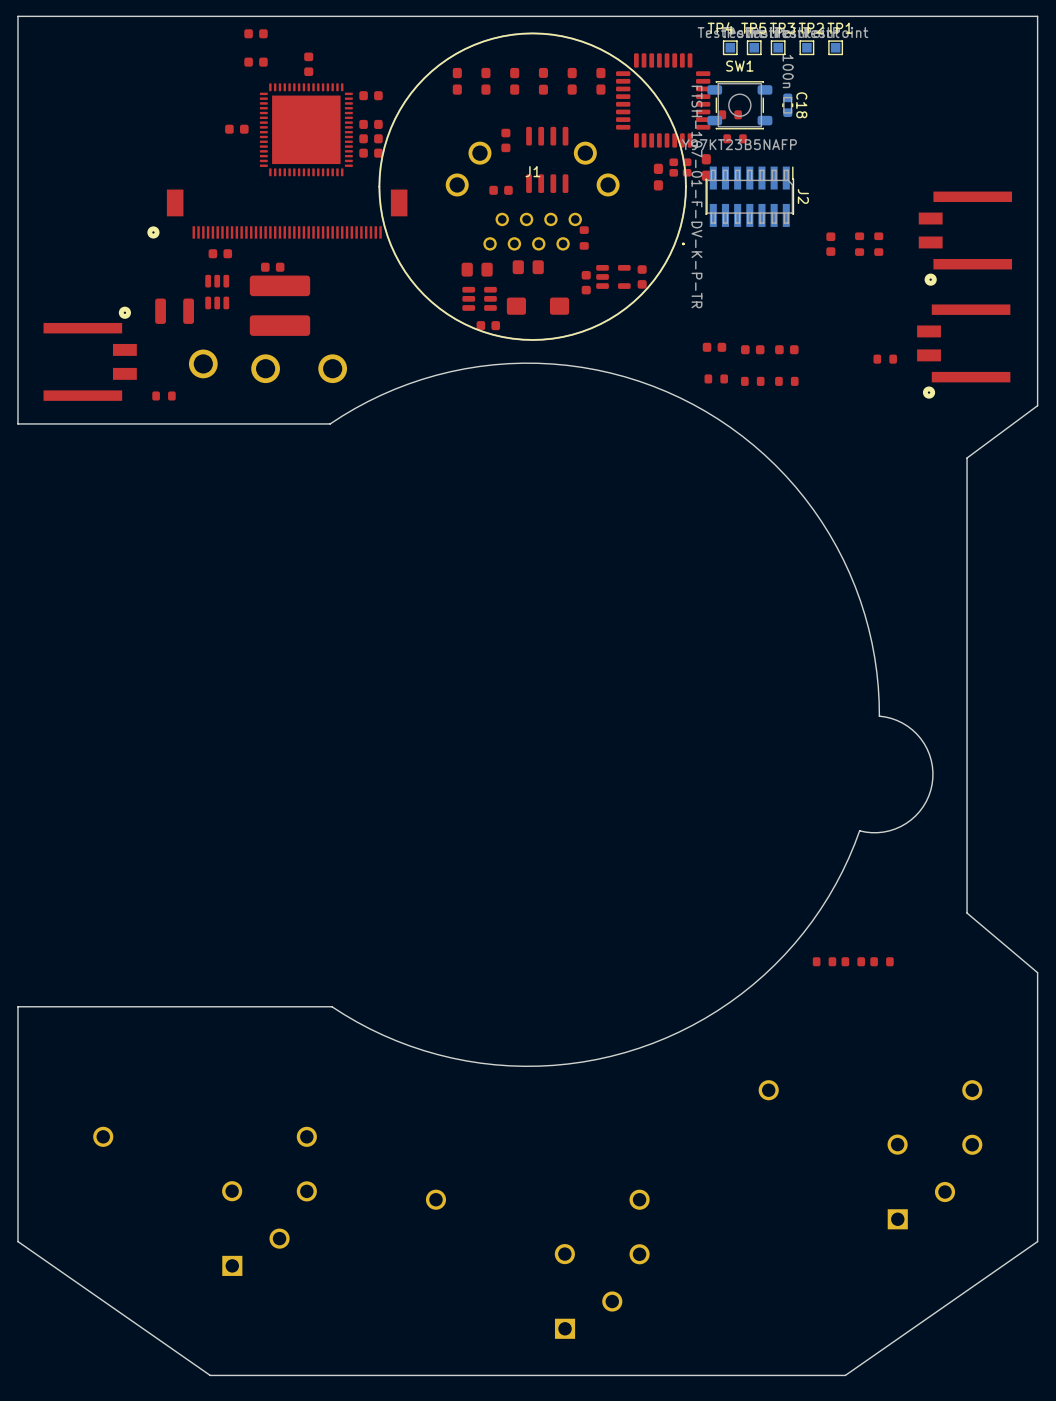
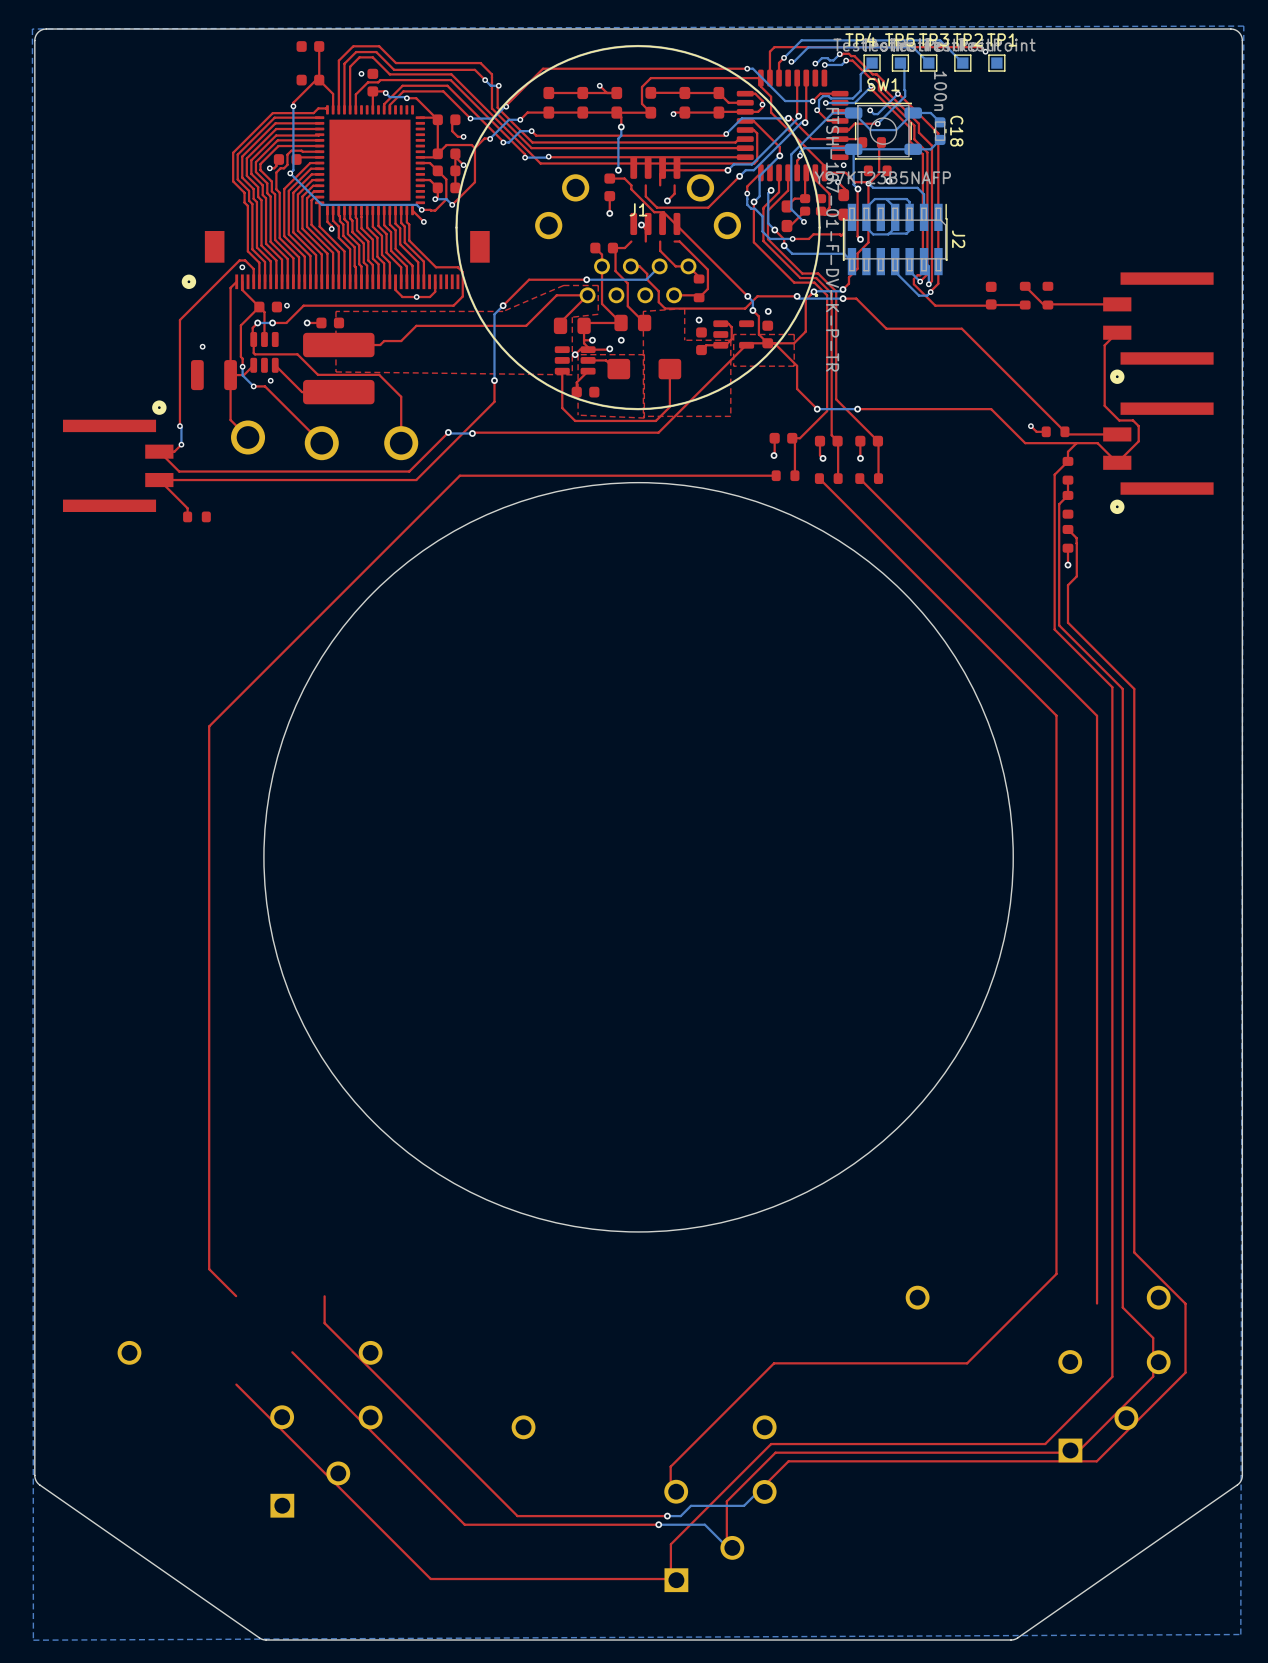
bottom zone outline: none -> (1243, 26) (32, 29) (33, 1640) (1240, 1634) (1243, 26)
top track: none -> (319, 46) (319, 80) (333, 93) (333, 109)
top track: none -> (353, 46) (379, 46) (395, 63) (480, 63) (491, 74) (491, 108) (531, 148) (745, 148)
top track: none -> (353, 46) (338, 60) (338, 109)
top track: none -> (985, 51) (980, 47) (774, 47) (769, 51) (769, 78)
via: none -> (985, 51)
top track: none -> (839, 54) (848, 53) (854, 56) (872, 74) (876, 74) (883, 81) (883, 88) (918, 123) (918, 132) (931, 145) (931, 281) (928, 284)
bottom track: none -> (839, 54) (833, 60) (821, 58) (815, 63)
via: none -> (839, 54)
top track: none -> (784, 57) (779, 62) (779, 78)
bottom track: none -> (784, 57) (801, 40) (940, 40) (962, 63)
via: none -> (784, 57)
top track: none -> (846, 60) (852, 60) (870, 78) (874, 78) (878, 82) (878, 90) (914, 125) (914, 139) (927, 152) (927, 274) (920, 281)
bottom track: none -> (846, 60) (841, 64) (824, 64)
via: none -> (846, 60)
bottom track: none -> (791, 61) (794, 61) (808, 47) (913, 47) (928, 63)
via: none -> (791, 61)
bottom track: none -> (872, 63) (860, 74) (860, 90) (852, 98) (830, 98) (828, 96) (823, 96) (819, 100) (819, 108) (817, 110)
via: none -> (815, 63)
via: none -> (824, 64)
bottom track: none -> (904, 67) (905, 96) (877, 123)
top track: none -> (747, 68) (543, 68) (506, 106)
bottom track: none -> (747, 68) (752, 68) (785, 101) (812, 101)
via: none -> (747, 68)
via: none -> (361, 73)
top track: none -> (797, 78) (798, 116)
top track: none -> (806, 78) (805, 122)
top track: none -> (316, 80) (293, 102) (293, 106)
top track: none -> (485, 80) (474, 69) (394, 69) (376, 52) (356, 52) (344, 63) (344, 109)
bottom track: none -> (485, 80) (490, 85) (498, 85)
via: none -> (485, 80)
top track: none -> (498, 85) (497, 107) (532, 142) (735, 142) (738, 139) (745, 139)
via: none -> (498, 85)
top track: none -> (599, 85) (606, 92)
via: none -> (599, 85)
top track: none -> (871, 85) (872, 89) (909, 127) (909, 141) (922, 154) (922, 272) (913, 278) (913, 284) (935, 305) (991, 304)
bottom track: none -> (871, 85) (854, 102) (825, 102)
via: none -> (871, 85)
top track: none -> (683, 92) (650, 92)
top track: none -> (385, 93) (372, 91) (372, 109)
bottom track: none -> (385, 93) (389, 97) (406, 98)
via: none -> (385, 93)
top track: none -> (616, 92) (548, 92)
top track: none -> (684, 92) (718, 92) (728, 102) (745, 102)
top track: none -> (745, 93) (755, 93) (762, 100) (762, 107) (758, 111) (719, 111)
top track: none -> (840, 93) (820, 93) (812, 101)
top track: none -> (897, 93) (938, 133) (938, 283) (930, 292)
bottom track: none -> (897, 93) (877, 114) (873, 114) (870, 110)
via: none -> (897, 93)
top track: none -> (406, 98) (416, 98) (437, 119) (437, 153) (446, 145) (471, 145) (474, 148)
via: none -> (406, 98)
via: none -> (812, 101)
via: none -> (825, 102)
via: none -> (762, 104)
bottom track: none -> (293, 106) (293, 170) (290, 173) (321, 204) (416, 204) (421, 209)
via: none -> (293, 106)
bottom track: none -> (506, 106) (493, 118) (470, 118)
via: none -> (506, 106)
top track: none -> (327, 109) (318, 108) (313, 113) (272, 113) (233, 152) (233, 181) (244, 192) (244, 202) (247, 205) (247, 251) (259, 262) (259, 281)
top track: none -> (350, 109) (350, 66) (359, 57) (372, 57) (389, 74) (451, 74) (540, 163) (754, 163) (757, 160) (757, 133) (753, 130) (745, 130)
top track: none -> (355, 109) (355, 94) (368, 82) (378, 82) (380, 80) (450, 80) (525, 154) (525, 157)
top track: none -> (384, 109) (384, 104) (402, 85) (447, 85) (503, 142)
top track: none -> (389, 109) (389, 105) (403, 91) (443, 91) (470, 118)
top track: none -> (817, 110) (827, 120) (840, 120)
via: none -> (817, 110)
via: none -> (870, 110)
top track: none -> (616, 112) (650, 112) (642, 103) (642, 86) (650, 78) (760, 78) (760, 86) (771, 96) (771, 112) (824, 165) (824, 172) (845, 172) (855, 182) (868, 183)
top track: none -> (718, 112) (675, 112) (673, 114)
via: none -> (673, 114)
bottom track: none -> (798, 116) (751, 164) (733, 164) (727, 170)
via: none -> (798, 116)
top track: none -> (319, 117) (274, 117) (237, 154) (237, 179) (249, 190) (249, 200) (252, 204) (252, 249) (265, 262) (265, 281)
top track: none -> (435, 117) (420, 117)
via: none -> (470, 118)
top track: none -> (788, 118) (791, 118) (811, 139) (859, 139) (862, 142)
bottom track: none -> (788, 118) (741, 118) (726, 133)
via: none -> (788, 118)
top track: none -> (520, 119) (527, 112) (616, 112) (621, 117) (621, 126)
bottom track: none -> (520, 119) (508, 119) (490, 138)
via: none -> (520, 119)
top track: none -> (745, 120) (753, 120) (779, 147) (779, 155)
bottom track: none -> (940, 122) (930, 112) (913, 112) (896, 130) (870, 130) (853, 112) (832, 112) (791, 154) (791, 209) (803, 221)
top track: none -> (319, 123) (275, 123) (242, 156) (242, 177) (253, 189) (253, 198) (256, 202) (256, 247) (270, 261) (270, 281)
top track: none -> (452, 122) (452, 131) (457, 136) (463, 136)
bottom track: none -> (805, 122) (801, 122) (753, 170) (745, 170) (739, 176)
via: none -> (805, 122)
top track: none -> (877, 123) (854, 123) (848, 130) (840, 130)
via: none -> (877, 123)
bottom track: none -> (621, 126) (621, 135) (618, 138) (618, 170)
via: none -> (621, 126)
top track: none -> (319, 129) (276, 129) (246, 158) (246, 175) (258, 187) (258, 196) (261, 200) (261, 245) (276, 260) (276, 281)
top track: none -> (531, 131) (536, 135) (724, 135) (726, 133)
bottom track: none -> (531, 131) (520, 131) (508, 142) (503, 142)
via: none -> (531, 131)
via: none -> (726, 133)
top track: none -> (319, 134) (276, 135) (251, 160) (251, 173) (262, 185) (262, 195) (266, 198) (266, 243) (282, 259) (282, 281)
via: none -> (463, 136)
top track: none -> (490, 138) (484, 138) (474, 148)
via: none -> (490, 138)
bottom track: none -> (940, 139) (930, 149) (853, 149) (853, 184) (858, 189)
top track: none -> (319, 140) (277, 140) (255, 162) (255, 172) (267, 183) (267, 193) (270, 196) (270, 241) (287, 258) (287, 281)
via: none -> (503, 142)
top track: none -> (881, 142) (879, 144) (879, 173) (868, 183)
top track: none -> (319, 146) (278, 146) (260, 164) (260, 170) (271, 181) (271, 191) (275, 194) (275, 239) (293, 258) (293, 281)
top track: none -> (474, 148) (474, 182) (452, 204)
bottom track: none -> (852, 148) (803, 148) (800, 152) (800, 155)
top track: none -> (319, 151) (291, 150) (287, 154) (287, 164) (276, 172) (276, 189) (279, 192) (279, 238) (299, 257) (299, 281)
top track: none -> (455, 153) (455, 187)
top track: none -> (548, 156) (745, 157)
bottom track: none -> (548, 156) (525, 157)
via: none -> (548, 156)
bottom track: none -> (779, 155) (759, 175) (759, 196) (754, 201)
via: none -> (779, 155)
top track: none -> (800, 155) (797, 160) (797, 172)
via: none -> (800, 155)
top track: none -> (319, 157) (298, 157)
top track: none -> (434, 157) (420, 157)
top track: none -> (455, 156) (463, 165)
via: none -> (525, 157)
top track: none -> (276, 162) (274, 168) (269, 168)
top track: none -> (319, 163) (310, 163) (284, 189) (284, 236) (304, 256) (304, 281)
top track: none -> (420, 163) (429, 163) (446, 179) (446, 199) (435, 210) (421, 209)
via: none -> (463, 165)
via: none -> (843, 165)
via: none -> (269, 168)
top track: none -> (319, 168) (310, 168) (288, 190) (288, 234) (310, 255) (310, 281)
via: none -> (618, 170)
top track: none -> (727, 170) (664, 170) (660, 174) (660, 185)
via: none -> (727, 170)
via: none -> (290, 173)
part position: (505, 140) -> (609, 187)
top track: none -> (760, 172) (747, 186) (747, 193)
top track: none -> (779, 172) (779, 192) (763, 207)
top track: none -> (788, 172) (788, 190) (767, 210) (767, 239) (802, 273) (818, 273) (836, 291) (836, 399) (878, 441) (878, 478)
top track: none -> (319, 174) (311, 174) (293, 192) (293, 232) (316, 255) (316, 281)
top track: none -> (805, 173) (805, 198) (794, 198) (786, 206)
top track: none -> (739, 176) (708, 207) (657, 207) (645, 196) (645, 185)
via: none -> (739, 176)
top track: none -> (609, 178) (624, 178) (631, 185) (631, 189) (654, 212) (663, 212) (747, 296)
top track: none -> (319, 180) (312, 180) (297, 194) (297, 230) (321, 254) (321, 281)
top track: none -> (420, 180) (429, 180) (437, 187) (437, 196) (435, 199)
top track: none -> (815, 179) (829, 193) (829, 207) (826, 211) (821, 211) (824, 214) (843, 214)
via: none -> (889, 181)
top track: none -> (838, 182) (845, 189) (845, 193)
via: none -> (838, 182)
top track: none -> (868, 183) (868, 242) (857, 253) (857, 268) (848, 277) (848, 283) (843, 289)
bottom track: none -> (868, 183) (873, 187) (917, 187) (924, 194) (924, 217)
via: none -> (868, 183)
top track: none -> (319, 185) (313, 185) (302, 196) (302, 228) (327, 253) (327, 281)
top track: none -> (674, 185) (674, 193) (667, 200)
top track: none -> (858, 189) (857, 236) (860, 239)
via: none -> (858, 189)
bottom track: none -> (771, 190) (768, 193) (768, 223) (774, 229)
via: none -> (771, 190)
top track: none -> (319, 191) (314, 191) (307, 198) (307, 226) (333, 252) (333, 281)
bottom track: none -> (747, 193) (747, 204) (762, 216) (762, 231) (769, 238) (792, 238)
via: none -> (747, 193)
top track: none -> (319, 197) (314, 197) (311, 200) (311, 224) (338, 252) (338, 281)
top track: none -> (609, 196) (609, 213)
bottom track: none -> (435, 199) (446, 199) (452, 204)
via: none -> (435, 199)
bottom track: none -> (886, 199) (895, 207) (895, 227) (888, 234) (873, 234) (866, 227) (866, 207) (874, 199) (906, 199) (909, 202) (909, 230) (906, 233) (889, 233)
via: none -> (667, 200)
top track: none -> (319, 202) (319, 226) (344, 251) (344, 281)
top track: none -> (754, 201) (753, 242) (794, 282) (814, 282) (827, 295) (827, 411) (799, 438) (792, 438) (794, 440) (794, 475)
via: none -> (754, 201)
via: none -> (452, 204)
top track: none -> (763, 208) (763, 241) (800, 278) (816, 278) (831, 293) (831, 435) (838, 441) (838, 478)
via: none -> (421, 209)
top track: none -> (327, 210) (327, 221) (331, 228)
top track: none -> (333, 210) (333, 220) (338, 226) (338, 237) (350, 249) (350, 281)
top track: none -> (338, 210) (339, 221) (343, 224) (343, 235) (354, 247) (355, 281)
top track: none -> (344, 210) (344, 219) (347, 222) (347, 234) (359, 245) (361, 281)
top track: none -> (350, 210) (352, 232) (363, 243) (363, 262) (367, 265) (367, 281)
top track: none -> (355, 210) (356, 230) (368, 241) (368, 260) (372, 265) (372, 281)
top track: none -> (361, 210) (361, 228) (372, 239) (372, 258) (378, 264) (378, 281)
top track: none -> (367, 210) (367, 227) (377, 237) (377, 256) (384, 263) (384, 281)
top track: none -> (372, 210) (372, 226) (381, 235) (381, 254) (389, 262) (389, 281)
top track: none -> (378, 210) (378, 226) (386, 234) (386, 252) (401, 267) (401, 281)
top track: none -> (384, 210) (384, 225) (391, 232) (391, 250) (406, 266) (406, 281)
top track: none -> (389, 210) (389, 224) (395, 230) (395, 248) (412, 265) (412, 281)
top track: none -> (395, 210) (395, 223) (400, 228) (400, 244) (418, 262) (418, 281)
top track: none -> (401, 210) (401, 222) (404, 226) (404, 242) (423, 261) (423, 281)
top track: none -> (406, 210) (409, 240) (436, 267) (457, 267) (462, 272) (462, 296) (453, 305) (303, 305) (286, 322) (272, 322)
top track: none -> (412, 210) (423, 221)
top track: none -> (805, 211) (790, 226)
via: none -> (609, 213)
via: none -> (423, 221)
via: none -> (803, 221)
top track: none -> (641, 224) (645, 229) (645, 241)
via: none -> (641, 224)
via: none -> (331, 228)
top track: none -> (774, 229) (784, 239) (784, 245)
via: none -> (774, 229)
part position: (501, 190) -> (604, 248)
top track: none -> (843, 233) (841, 235) (813, 234) (808, 238) (792, 238)
via: none -> (792, 238)
via: none -> (860, 239)
top track: none -> (631, 241) (624, 248) (612, 248) (615, 250) (615, 271) (627, 283) (627, 306) (644, 322)
top track: none -> (660, 241) (660, 250) (675, 266) (688, 266) (699, 279)
top track: none -> (674, 241) (679, 241) (707, 269) (707, 288) (699, 297) (696, 295) (674, 295)
bottom track: none -> (784, 245) (792, 253) (844, 253) (851, 261)
via: none -> (784, 245)
top track: none -> (595, 248) (602, 254) (602, 303) (621, 322) (586, 322) (584, 325) (584, 343) (588, 349)
bottom track: none -> (924, 261) (928, 266) (928, 284)
top track: none -> (630, 266) (639, 266) (647, 273) (647, 279) (658, 291) (658, 302) (665, 308) (745, 308) (757, 296) (797, 296)
bottom track: none -> (659, 266) (646, 279) (586, 279)
via: none -> (242, 267)
bottom track: none -> (909, 271) (920, 281)
bottom track: none -> (895, 271) (919, 295) (927, 295) (930, 292)
top track: none -> (586, 279) (529, 279) (503, 305)
via: none -> (586, 279)
top track: none -> (236, 281) (230, 287) (230, 420) (236, 426) (248, 426)
top track: none -> (242, 281) (242, 289) (264, 312) (264, 339)
top track: none -> (253, 281) (253, 269) (245, 260) (239, 260) (179, 320) (179, 426)
top track: none -> (435, 281) (435, 291) (429, 297) (402, 297) (395, 289) (395, 281)
via: none -> (920, 281)
via: none -> (928, 284)
top zone outline: none -> (598, 285) (598, 314) (572, 317) (572, 374) (335, 371) (335, 311) (503, 311) (563, 285) (598, 285)
top track: none -> (1025, 286) (1043, 305)
bottom track: none -> (843, 289) (841, 291) (813, 291)
via: none -> (843, 289)
part position: (965, 238) -> (1158, 328)
top track: none -> (813, 291) (805, 299) (805, 331) (794, 343) (747, 343) (658, 432) (472, 433)
via: none -> (813, 291)
via: none -> (930, 292)
bottom track: none -> (747, 296) (752, 301) (752, 310)
via: none -> (747, 296)
bottom track: none -> (797, 296) (799, 298) (843, 298)
via: none -> (797, 296)
via: none -> (416, 297)
top track: none -> (843, 298) (856, 298) (886, 328) (961, 328) (1064, 431)
via: none -> (843, 298)
top track: none -> (1117, 304) (1048, 304)
via: none -> (286, 305)
bottom track: none -> (503, 305) (494, 314) (494, 380)
via: none -> (503, 305)
top track: none -> (1025, 305) (991, 305)
top track: none -> (259, 307) (240, 325) (242, 366)
top zone outline: none -> (684, 308) (643, 311) (643, 416) (730, 416) (730, 340) (684, 340) (684, 308)
top track: none -> (752, 310) (758, 316) (758, 334) (767, 343)
via: none -> (752, 310)
via: none -> (768, 311)
via: none -> (699, 320)
top track: none -> (257, 322) (252, 327) (254, 354) (297, 354) (317, 374) (379, 374) (401, 396) (401, 443)
via: none -> (257, 322)
bottom track: none -> (272, 322) (257, 322)
via: none -> (272, 322)
via: none -> (307, 322)
top track: none -> (321, 322) (307, 322)
top track: none -> (720, 323) (728, 323) (731, 327) (731, 339) (725, 345) (706, 345) (701, 350)
top track: none -> (560, 325) (560, 322) (587, 295) (556, 295) (526, 325) (416, 325) (401, 341) (384, 341) (380, 345) (338, 345)
top track: none -> (1117, 332) (1104, 345) (1104, 405) (1119, 420) (1133, 420) (1138, 426) (1138, 441) (1117, 462) (1097, 443) (1025, 443) (991, 409) (857, 409)
top zone outline: none -> (794, 334) (733, 334) (733, 366) (794, 366) (794, 334)
top track: none -> (592, 340) (584, 340)
via: none -> (592, 340)
via: none -> (621, 340)
top track: none -> (774, 343) (797, 365) (797, 388) (817, 409)
via: none -> (202, 346)
top track: none -> (609, 348) (580, 349) (575, 354)
via: none -> (609, 348)
via: none -> (575, 354)
top zone outline: none -> (644, 354) (644, 418) (578, 415) (578, 354) (644, 354)
top track: none -> (588, 360) (606, 360) (614, 369)
top track: none -> (253, 365) (243, 375) (230, 375)
top track: none -> (275, 365) (302, 392) (338, 392)
bottom track: none -> (242, 366) (242, 375) (253, 386)
via: none -> (242, 366)
top track: none -> (669, 369) (669, 406) (655, 420) (575, 420) (562, 408) (562, 371)
top track: none -> (588, 371) (576, 382) (576, 392)
top track: none -> (494, 380) (494, 401) (416, 480) (159, 480) (187, 508) (187, 516)
via: none -> (494, 380)
via: none -> (270, 380)
top track: none -> (253, 386) (265, 386) (310, 431) (321, 431)
via: none -> (253, 386)
via: none -> (817, 409)
bottom track: none -> (857, 409) (817, 409)
via: none -> (857, 409)
part: (714, 347) -> none
part: (752, 349) -> none
part: (786, 349) -> none
part position: (963, 351) -> (1158, 458)
part position: (90, 353) -> (118, 456)
bottom track: none -> (179, 426) (181, 444)
via: none -> (179, 426)
top track: none -> (1030, 426) (1036, 431) (1046, 431)
via: none -> (1030, 426)
top track: none -> (448, 432) (409, 471) (179, 471) (159, 451) (174, 451) (181, 444)
bottom track: none -> (448, 432) (472, 433)
via: none -> (448, 432)
via: none -> (472, 433)
top track: none -> (1117, 434) (1067, 434)
top track: none -> (774, 438) (774, 455)
part: none -> (783, 438)
top track: none -> (820, 441) (820, 455) (823, 458)
part: none -> (828, 441)
top track: none -> (860, 441) (860, 458)
part: none -> (869, 441)
top track: none -> (1076, 443) (1067, 451) (1067, 461) (1054, 474) (1054, 629) (1112, 687) (1112, 1376) (1045, 1444) (771, 1444) (670, 1544) (670, 1579) (430, 1579) (236, 1384)
via: none -> (181, 444)
part: (716, 378) -> none
via: none -> (774, 455)
via: none -> (823, 458)
via: none -> (860, 458)
part: (752, 381) -> none
part: (786, 381) -> none
part: none -> (1067, 470)
part position: (163, 395) -> (196, 516)
top track: none -> (776, 475) (459, 475) (209, 726) (209, 1269) (236, 1296)
part: none -> (785, 475)
top track: none -> (819, 478) (1056, 715) (1056, 1274) (967, 1363) (774, 1363) (670, 1466) (670, 1490)
part: none -> (828, 478)
top track: none -> (859, 478) (1097, 715) (1097, 1303)
part: none -> (869, 478)
top track: none -> (1067, 480) (1067, 495) (1059, 504) (1059, 625) (1122, 688) (1122, 1307) (1153, 1338) (1153, 1376) (1077, 1452) (775, 1452) (726, 1501) (726, 1546)
round board edge: none -> [263, 482, 1014, 1233]
part: none -> (1067, 504)
top track: none -> (1067, 529) (1076, 538) (1076, 543)
part: none -> (1067, 538)
top track: none -> (1076, 543) (1076, 576) (1067, 585) (1067, 622) (1134, 688) (1134, 1252) (1185, 1303) (1185, 1372) (1096, 1461) (788, 1461) (759, 1490)
top track: none -> (1067, 548) (1067, 565)
via: none -> (1067, 565)
board edge: (859, 830) (871, 832) (889, 830) (906, 823) (915, 815) (926, 801) (932, 784) (932, 772) (929, 754) (924, 743) (912, 729) (897, 720) (879, 716) (874, 657) (860, 600) (836, 547) (813, 509) (785, 475) (753, 445) (718, 419) (679, 397) (639, 381) (596, 369) (552, 364) (508, 363) (465, 368) (422, 379) (368, 401) (330, 423) (17, 423) (17, 16) (1037, 16) (1037, 405) (967, 458) (967, 913) (1037, 972) (1037, 1241) (845, 1375) (210, 1375) (17, 1241) (17, 1006) (332, 1006) (356, 1021) (396, 1040) (423, 1050) (466, 1060) (524, 1066) (567, 1064) (596, 1059) (638, 1048) (679, 1031) (717, 1010) (752, 984) (784, 954) (812, 920) (835, 884) (859, 830) -> (1230, 29) (1238, 32) (1242, 40) (1242, 1475) (1239, 1483) (1017, 1637) (1011, 1640) (263, 1639) (38, 1484) (34, 1475) (34, 40) (37, 33) (46, 29) (1230, 29)
part: (824, 961) -> none
part: (853, 961) -> none
part: (882, 961) -> none
top track: none -> (324, 1296) (324, 1323) (517, 1516) (667, 1516)
top track: none -> (292, 1352) (464, 1524) (658, 1524)
bottom track: none -> (759, 1490) (744, 1505) (690, 1505) (680, 1516) (667, 1516)
via: none -> (667, 1516)
bottom track: none -> (658, 1524) (704, 1524) (726, 1546)
via: none -> (658, 1524)

